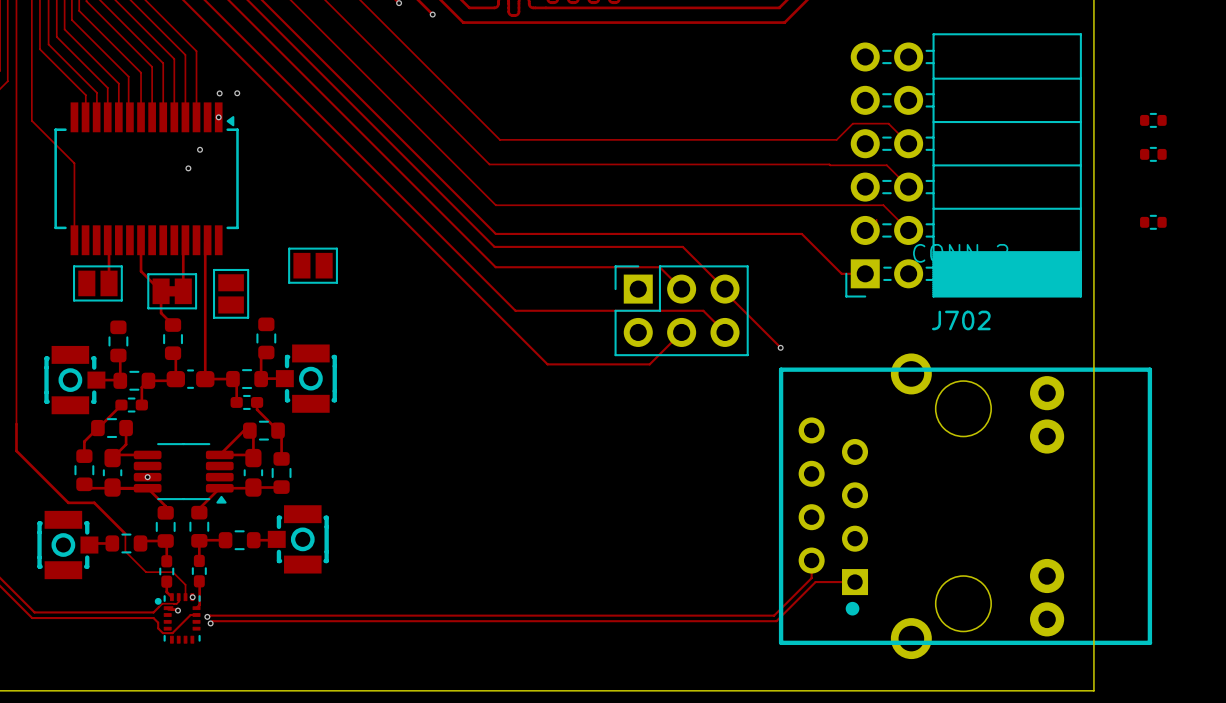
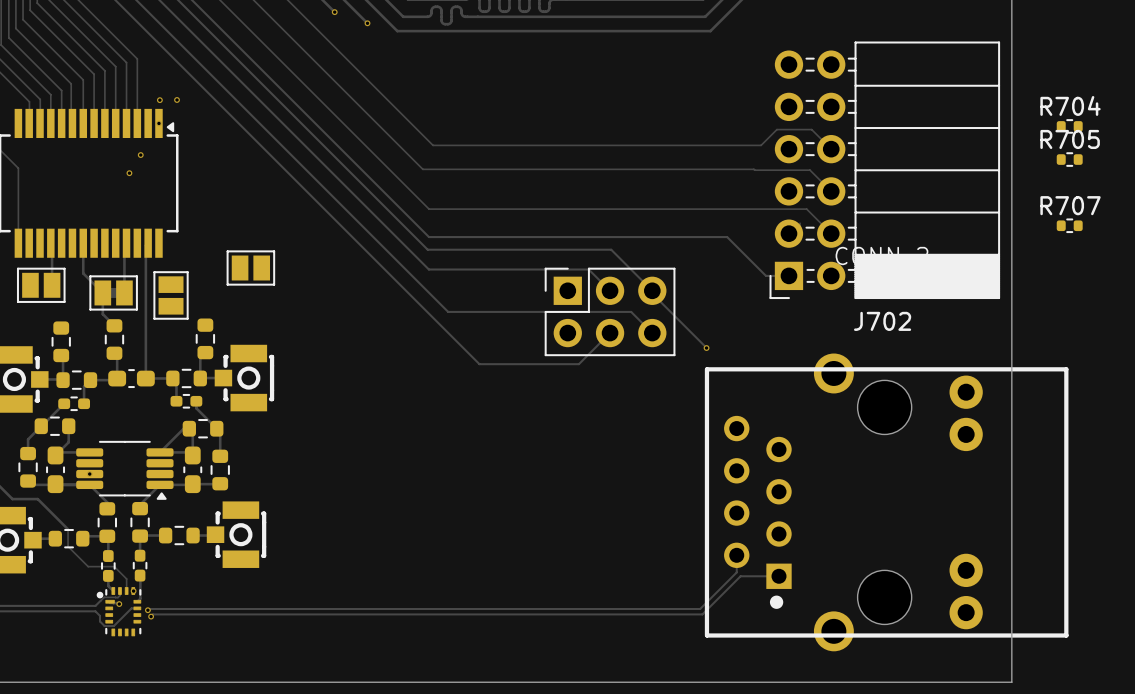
R704 name: none -> R704 (1070, 105)
R705 name: none -> R705 (1070, 139)
R707 name: none -> R707 (1070, 205)

